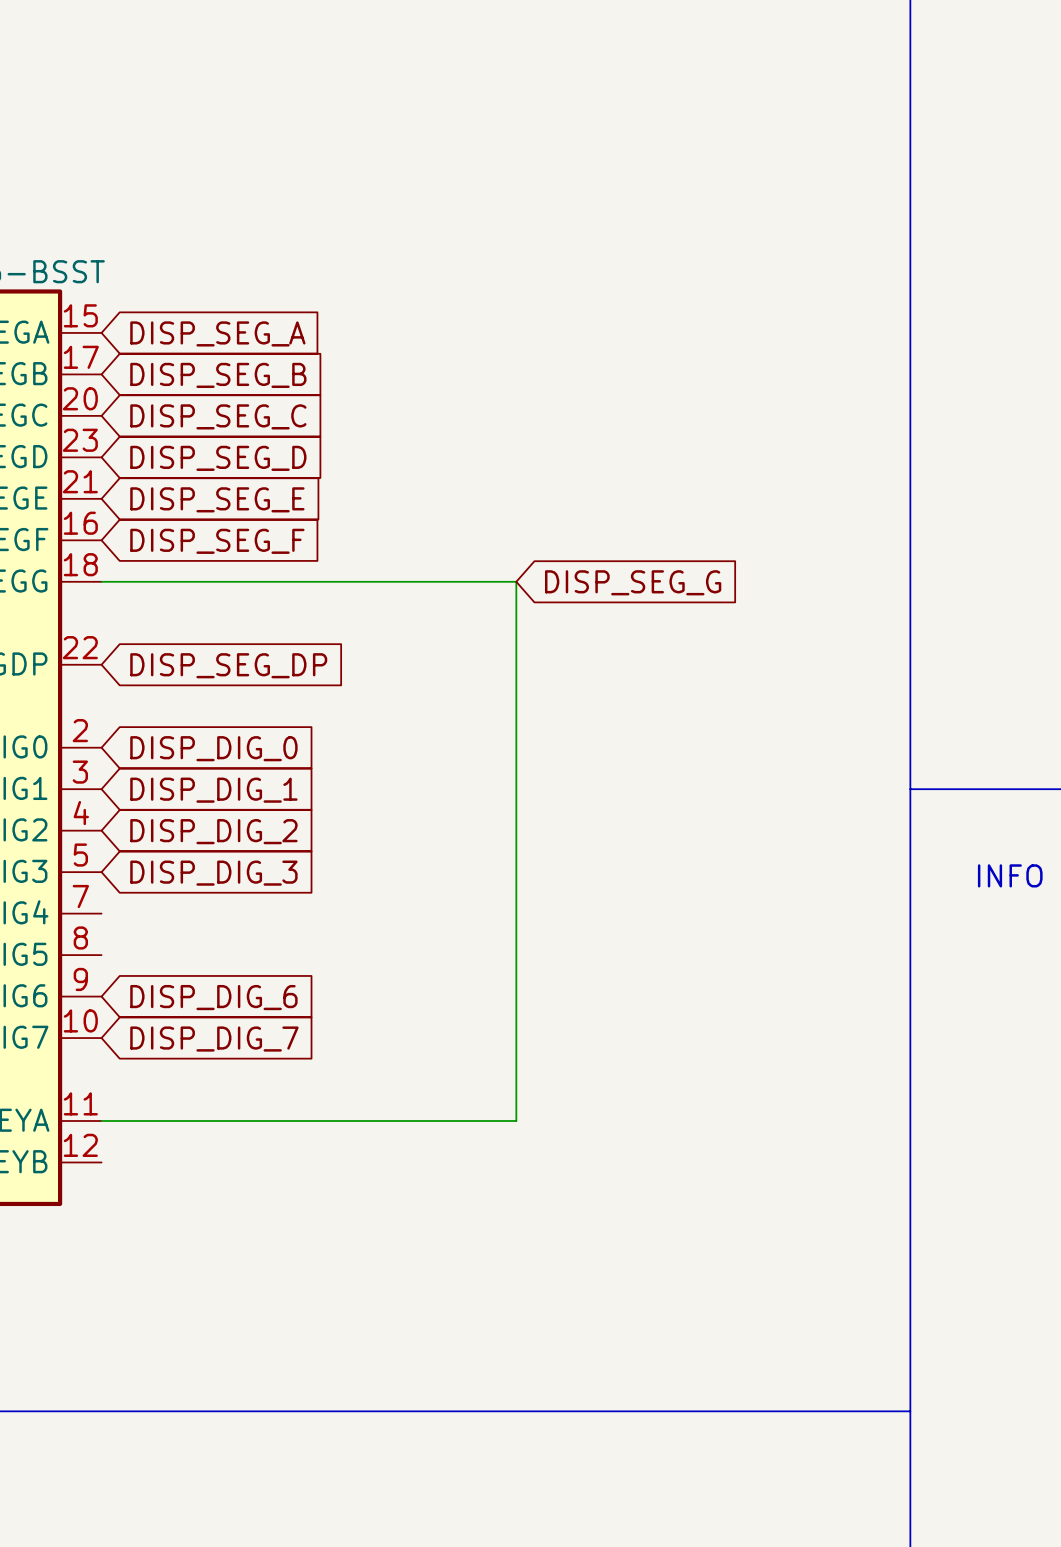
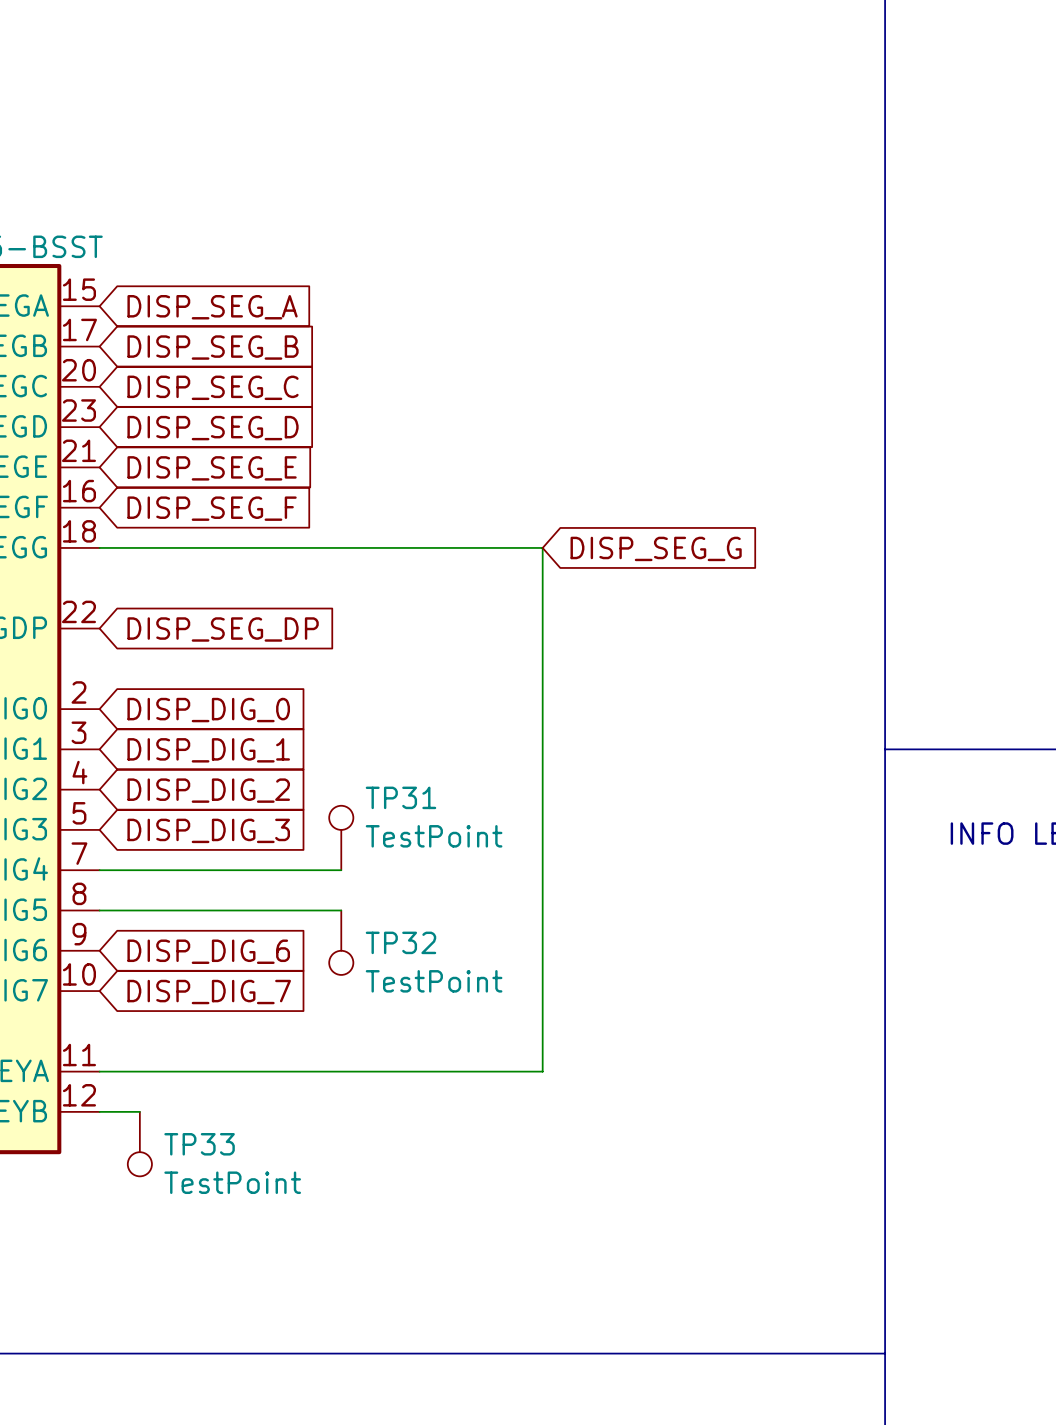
wire: (516, 581) (516, 1121) -> (502, 547) (542, 547) (542, 1071) (502, 1071)
global label position: DISP_SEG_G (633, 582) -> DISP_SEG_G (656, 548)
TP31: none -> TestPoint (341, 837)
wire: none -> (99, 870) (341, 870)
wire: none -> (99, 910) (341, 910)
TP32: none -> TestPoint (341, 942)
wire: none -> (99, 1111) (139, 1111)
TP33: none -> TestPoint (139, 1144)

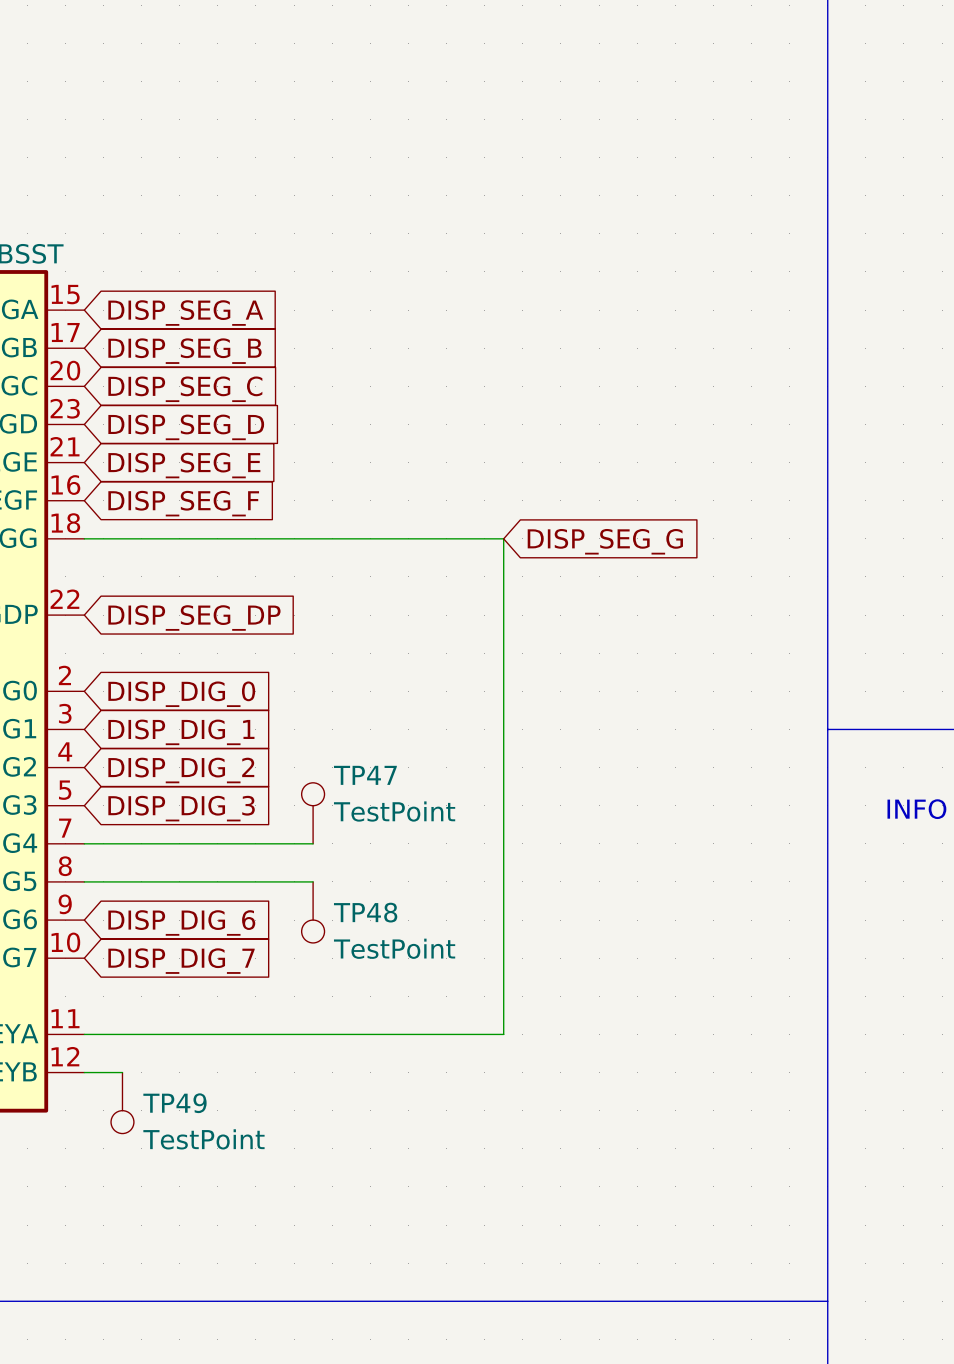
TP31 name: TP31 (400, 797) -> TP47 (365, 775)
TP32 name: TP32 (400, 942) -> TP48 (365, 912)
TP33 name: TP33 (199, 1144) -> TP49 (174, 1103)

